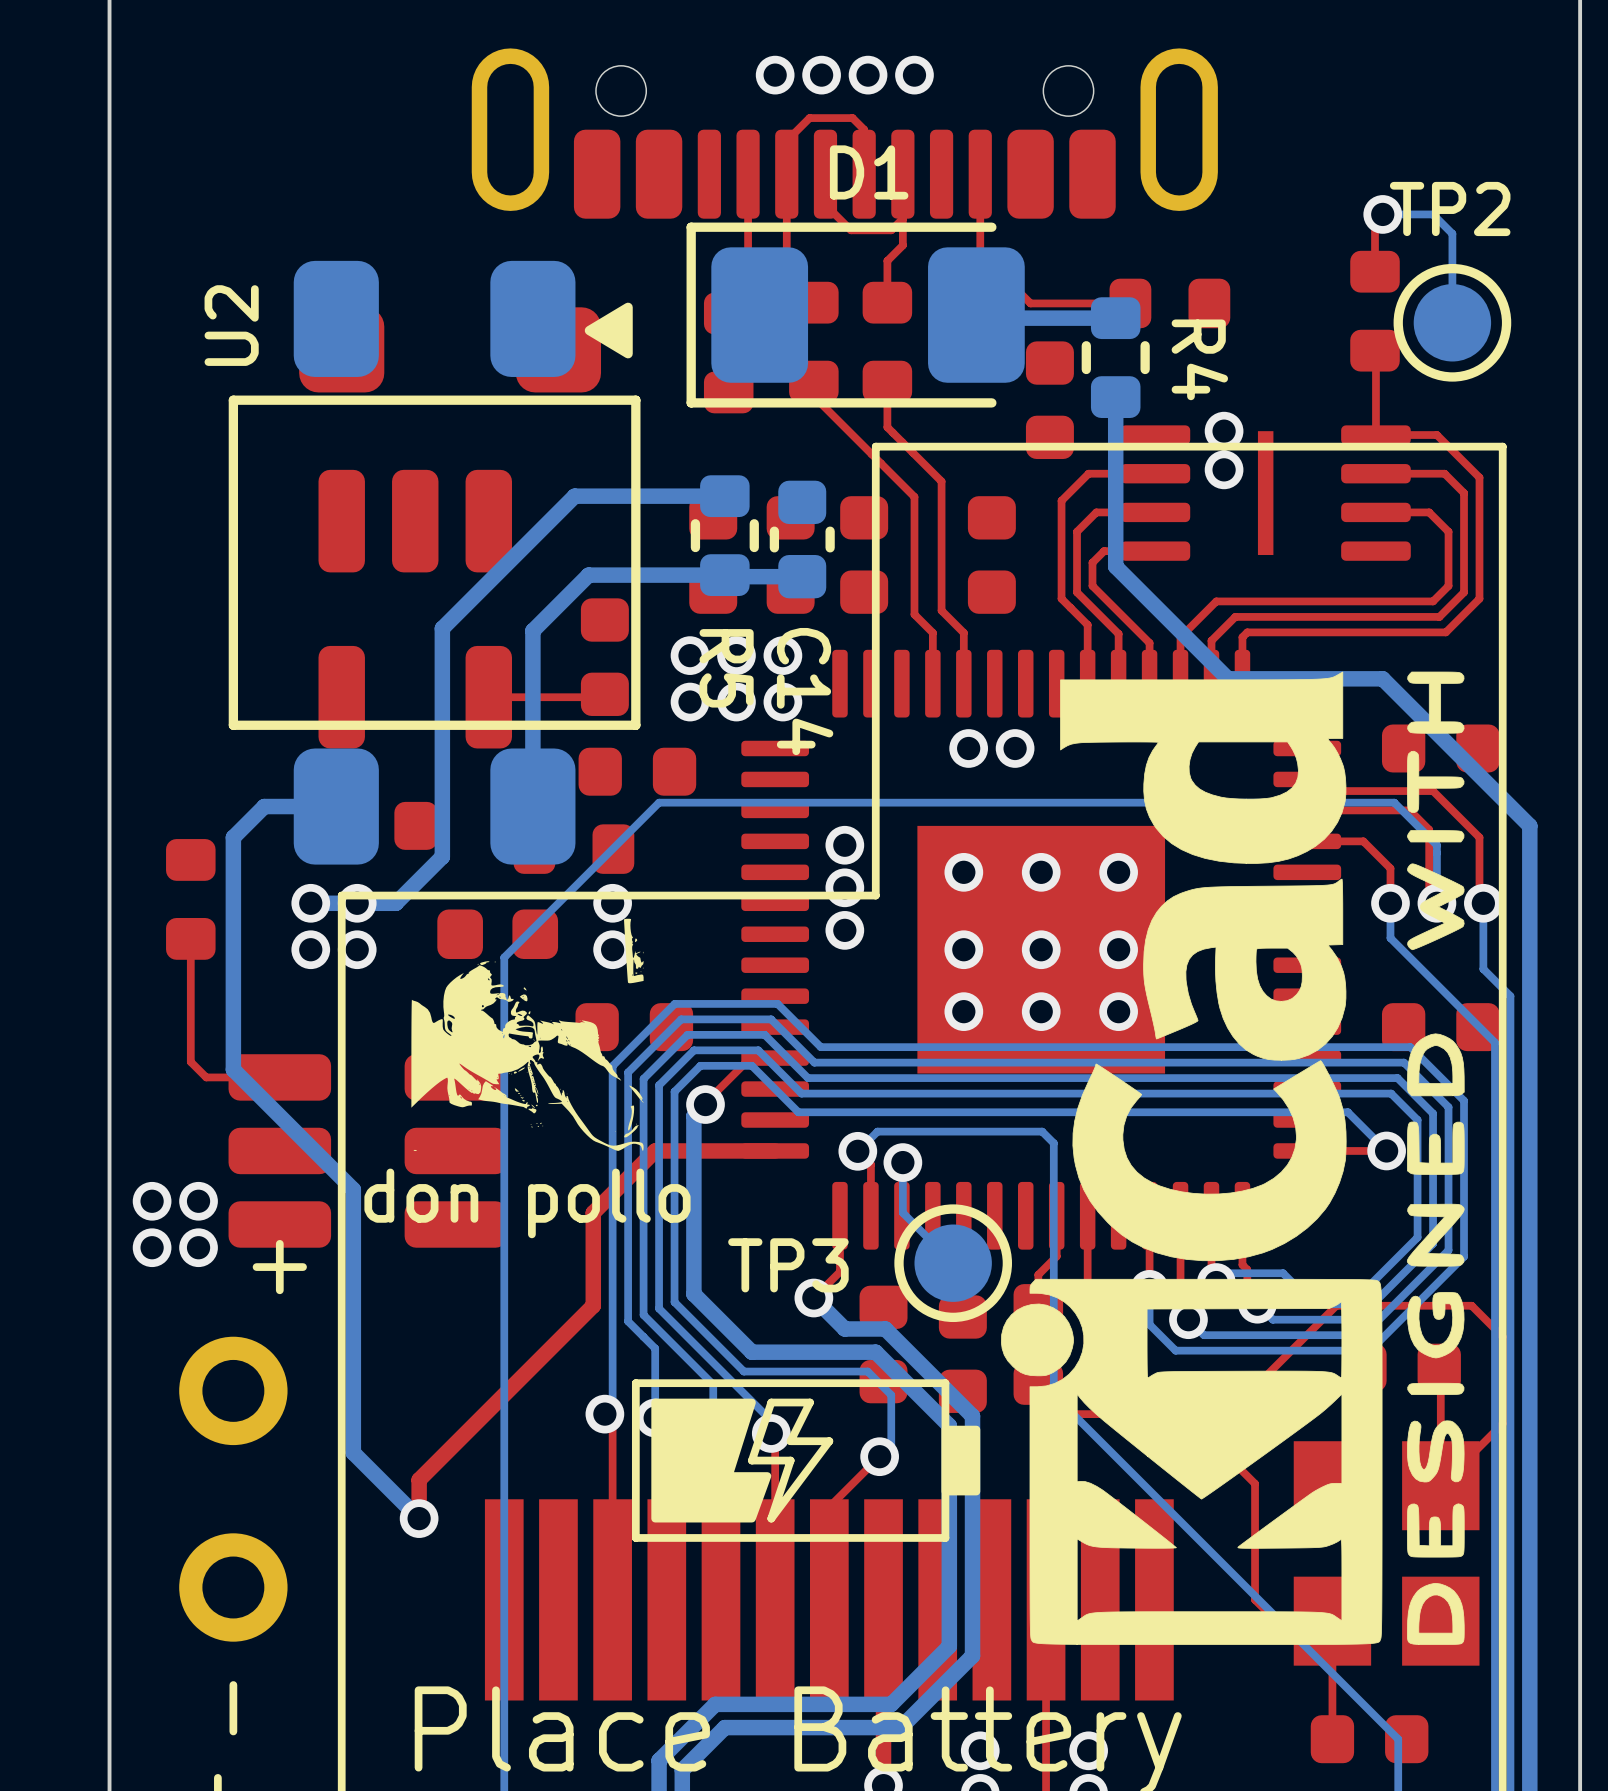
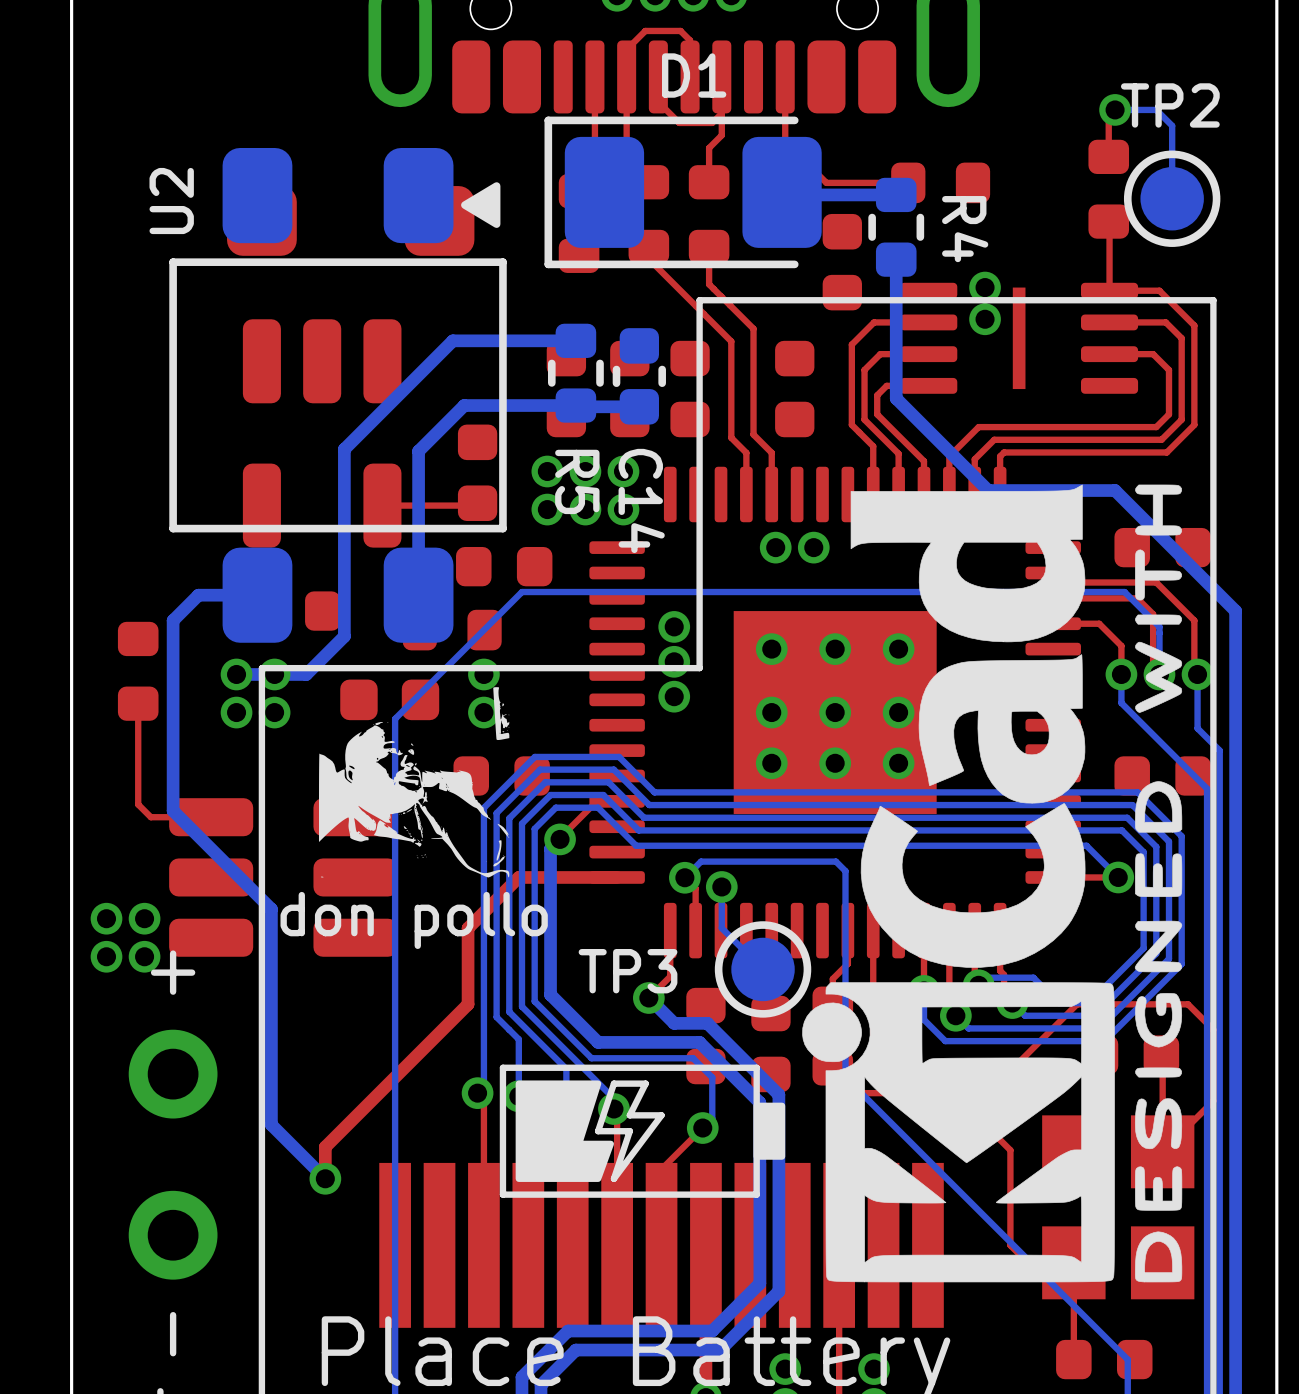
line: (279, 1243) (279, 1290) -> (173, 953) (173, 991)
line: (303, 1267) (256, 1267) -> (154, 972) (192, 972)

